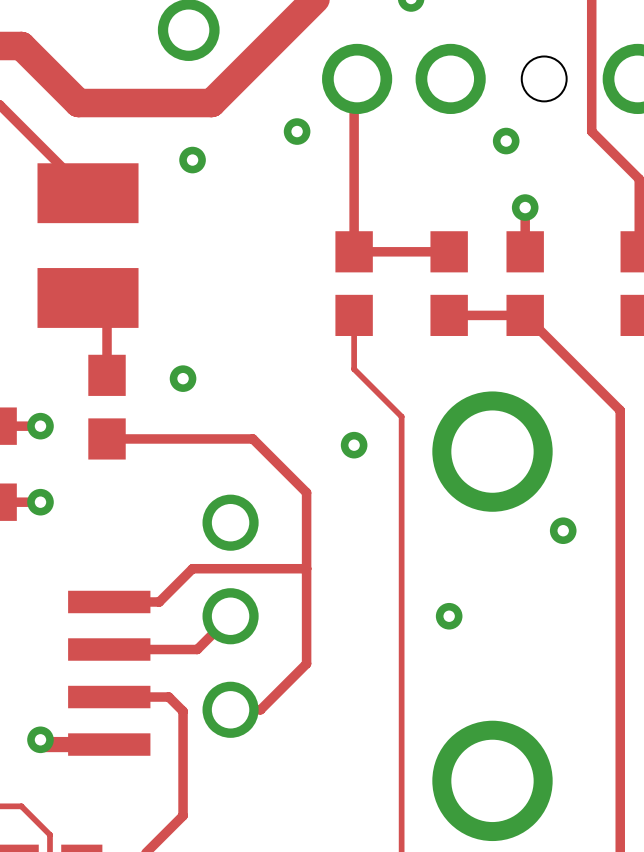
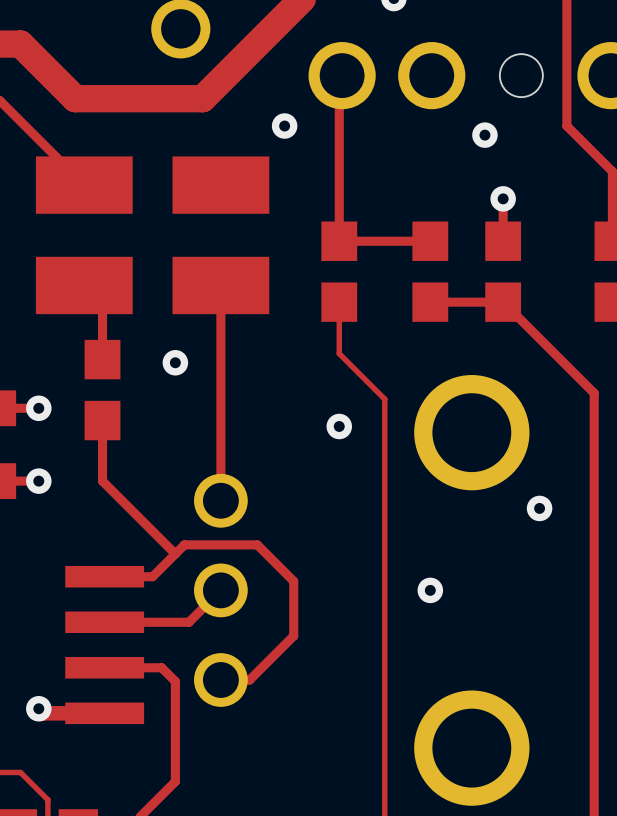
via: (192, 160) -> none
part: none -> (220, 235)
top track: none -> (220, 285) (220, 500)
top track: (107, 438) (252, 438) (306, 492) (306, 606) -> (102, 420) (102, 481) (175, 553)
top track: (306, 568) (268, 568) -> (293, 581) (257, 544)

